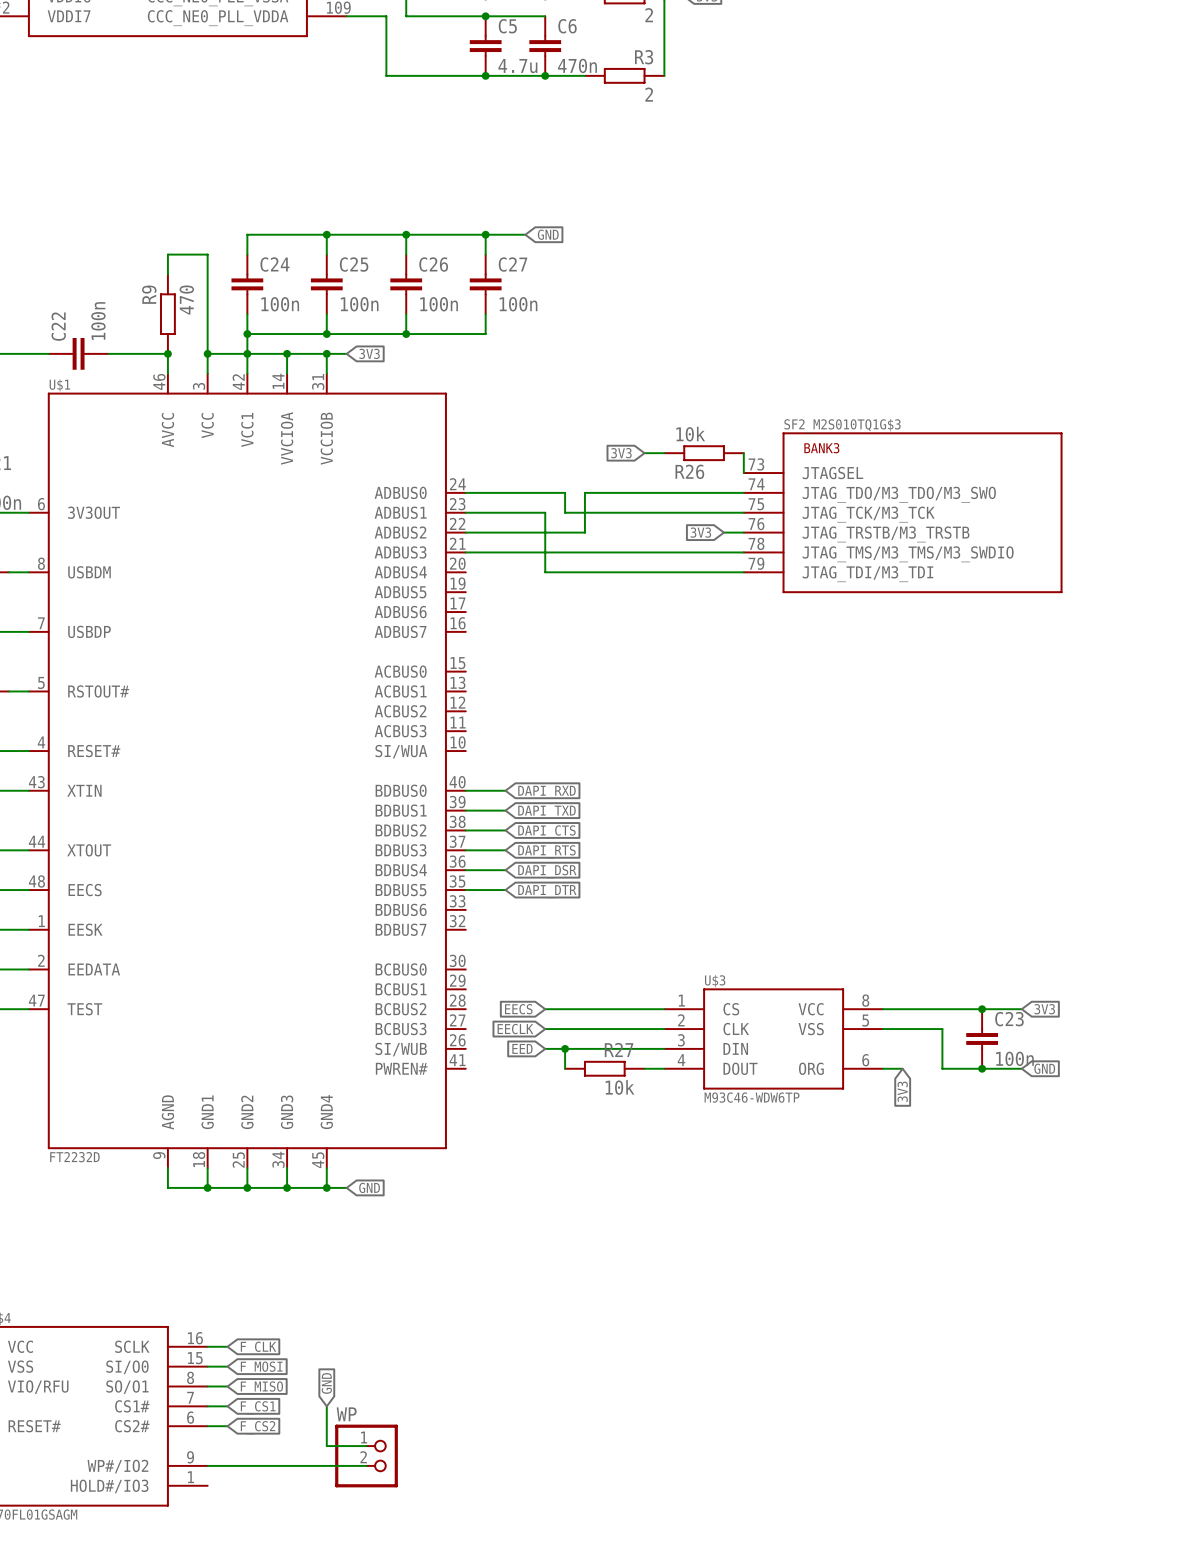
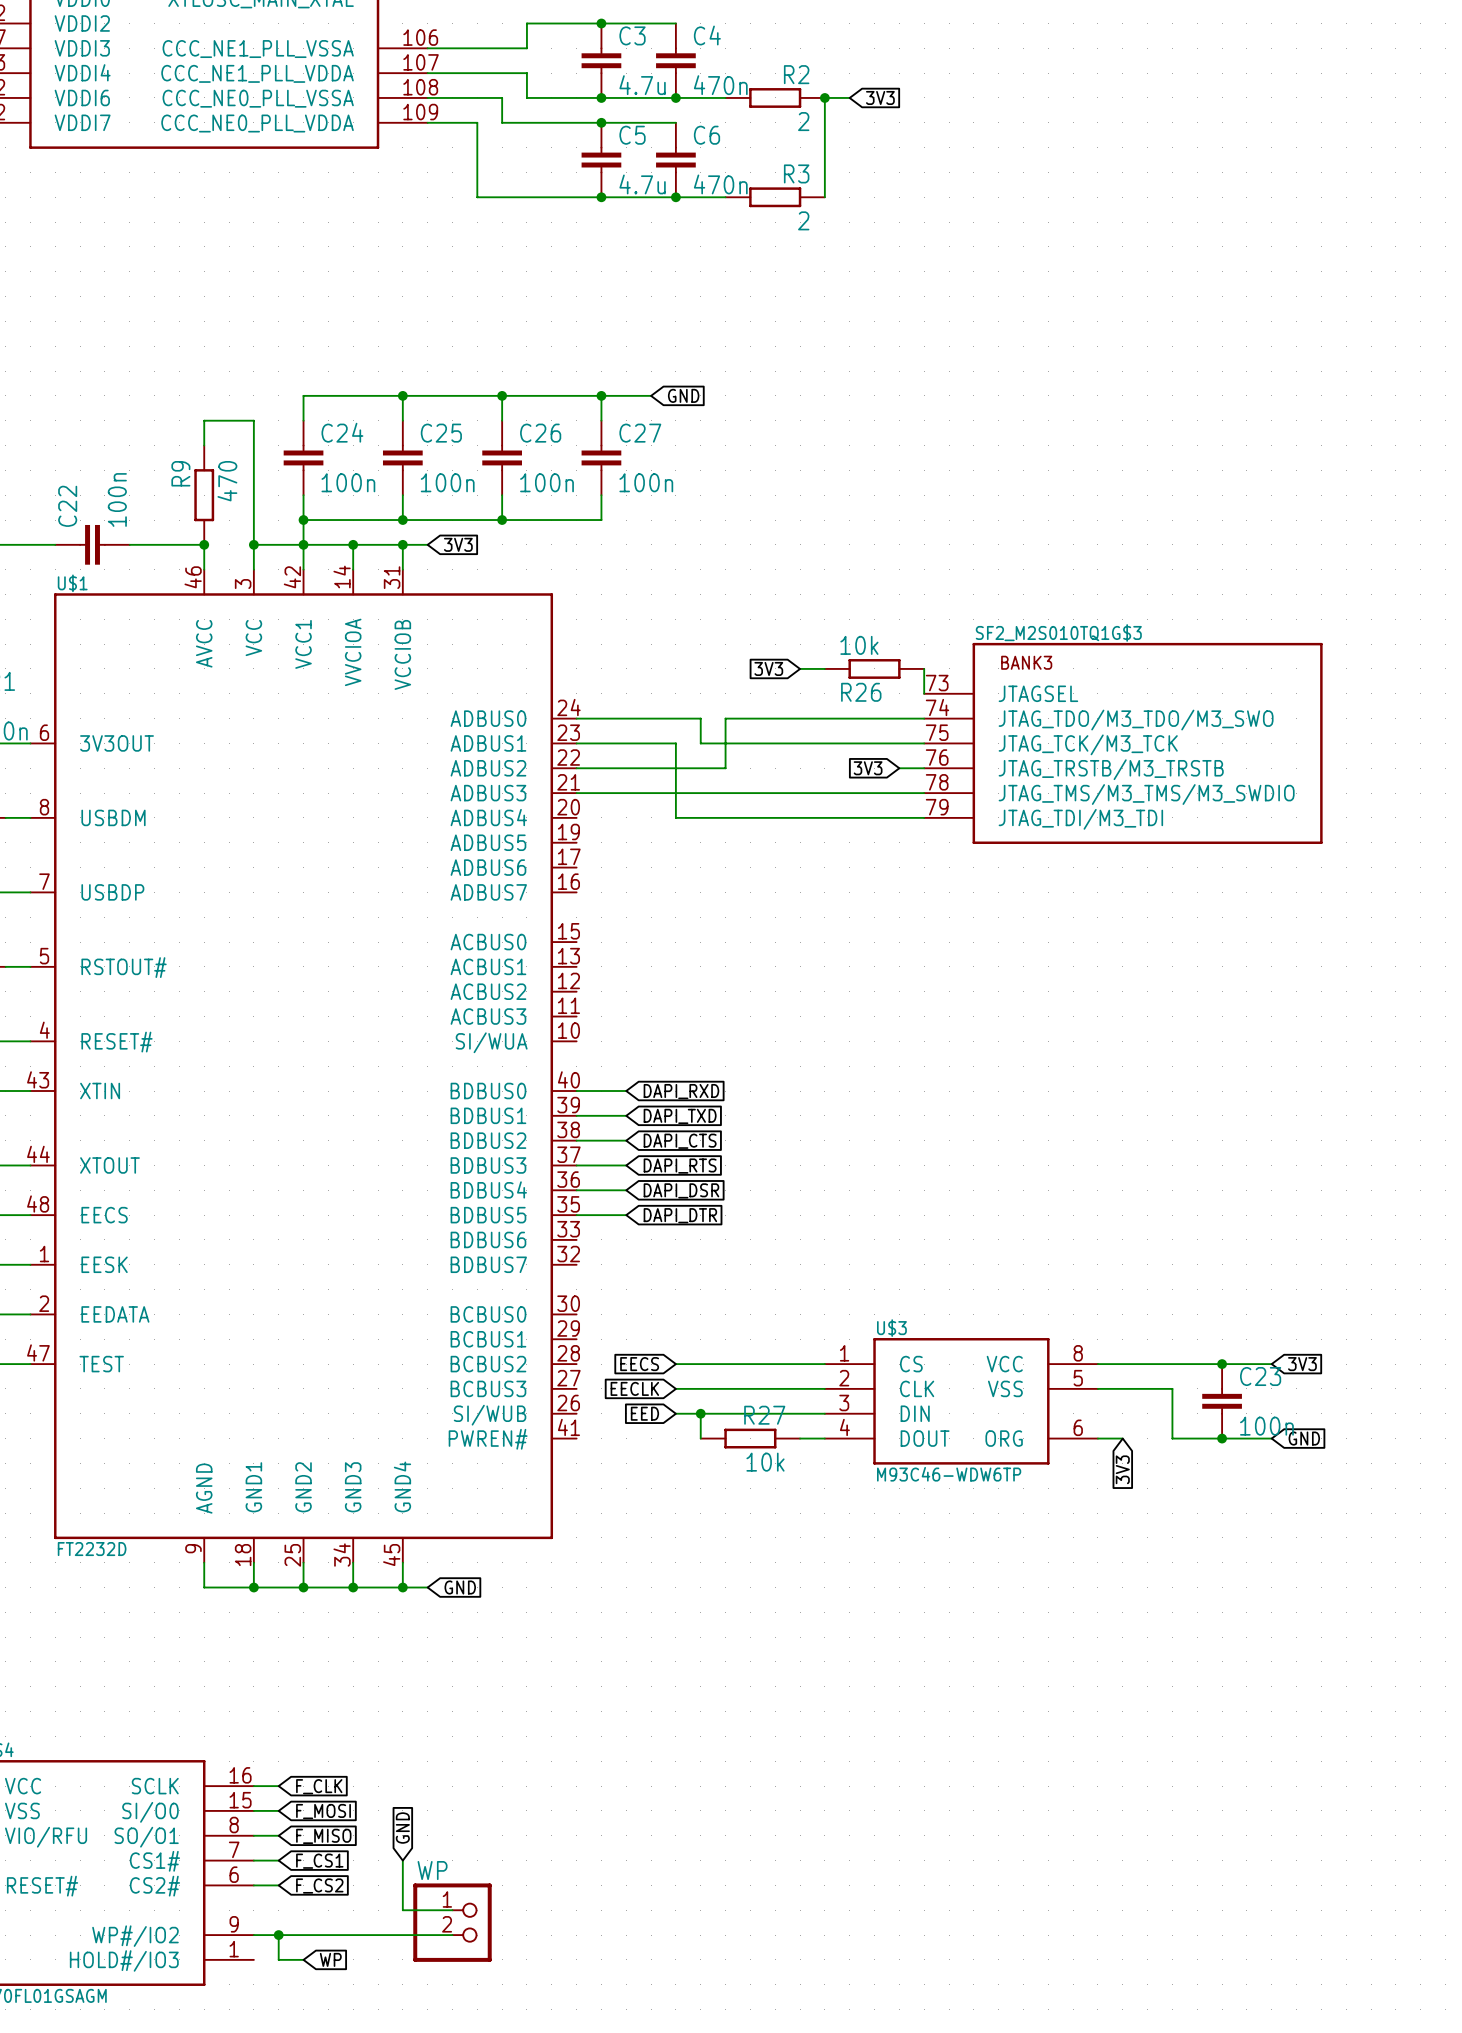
wire: none -> (278, 1935) (278, 1959) (303, 1959)
junction: none -> (278, 1935)
global label: none -> WP (330, 1959)

